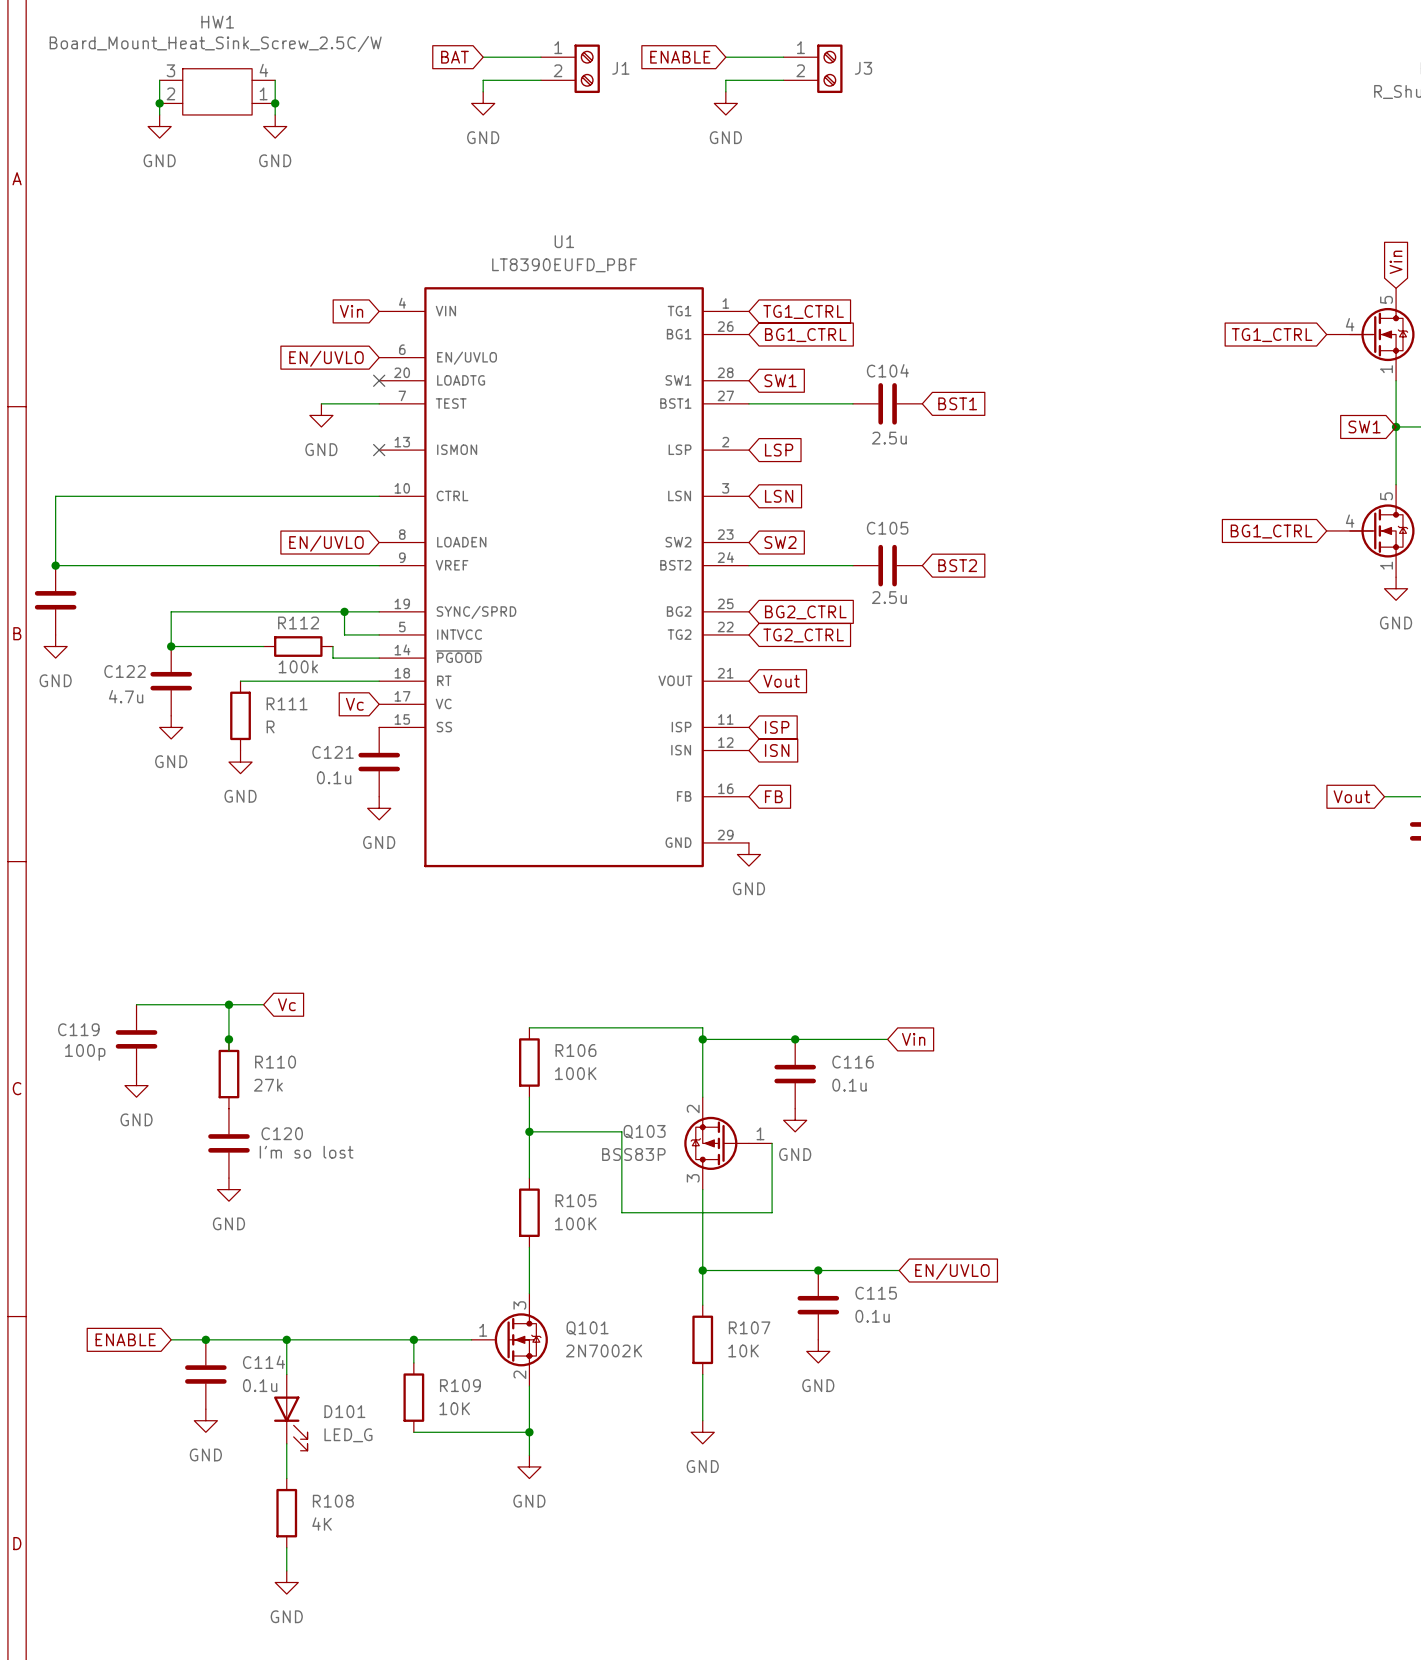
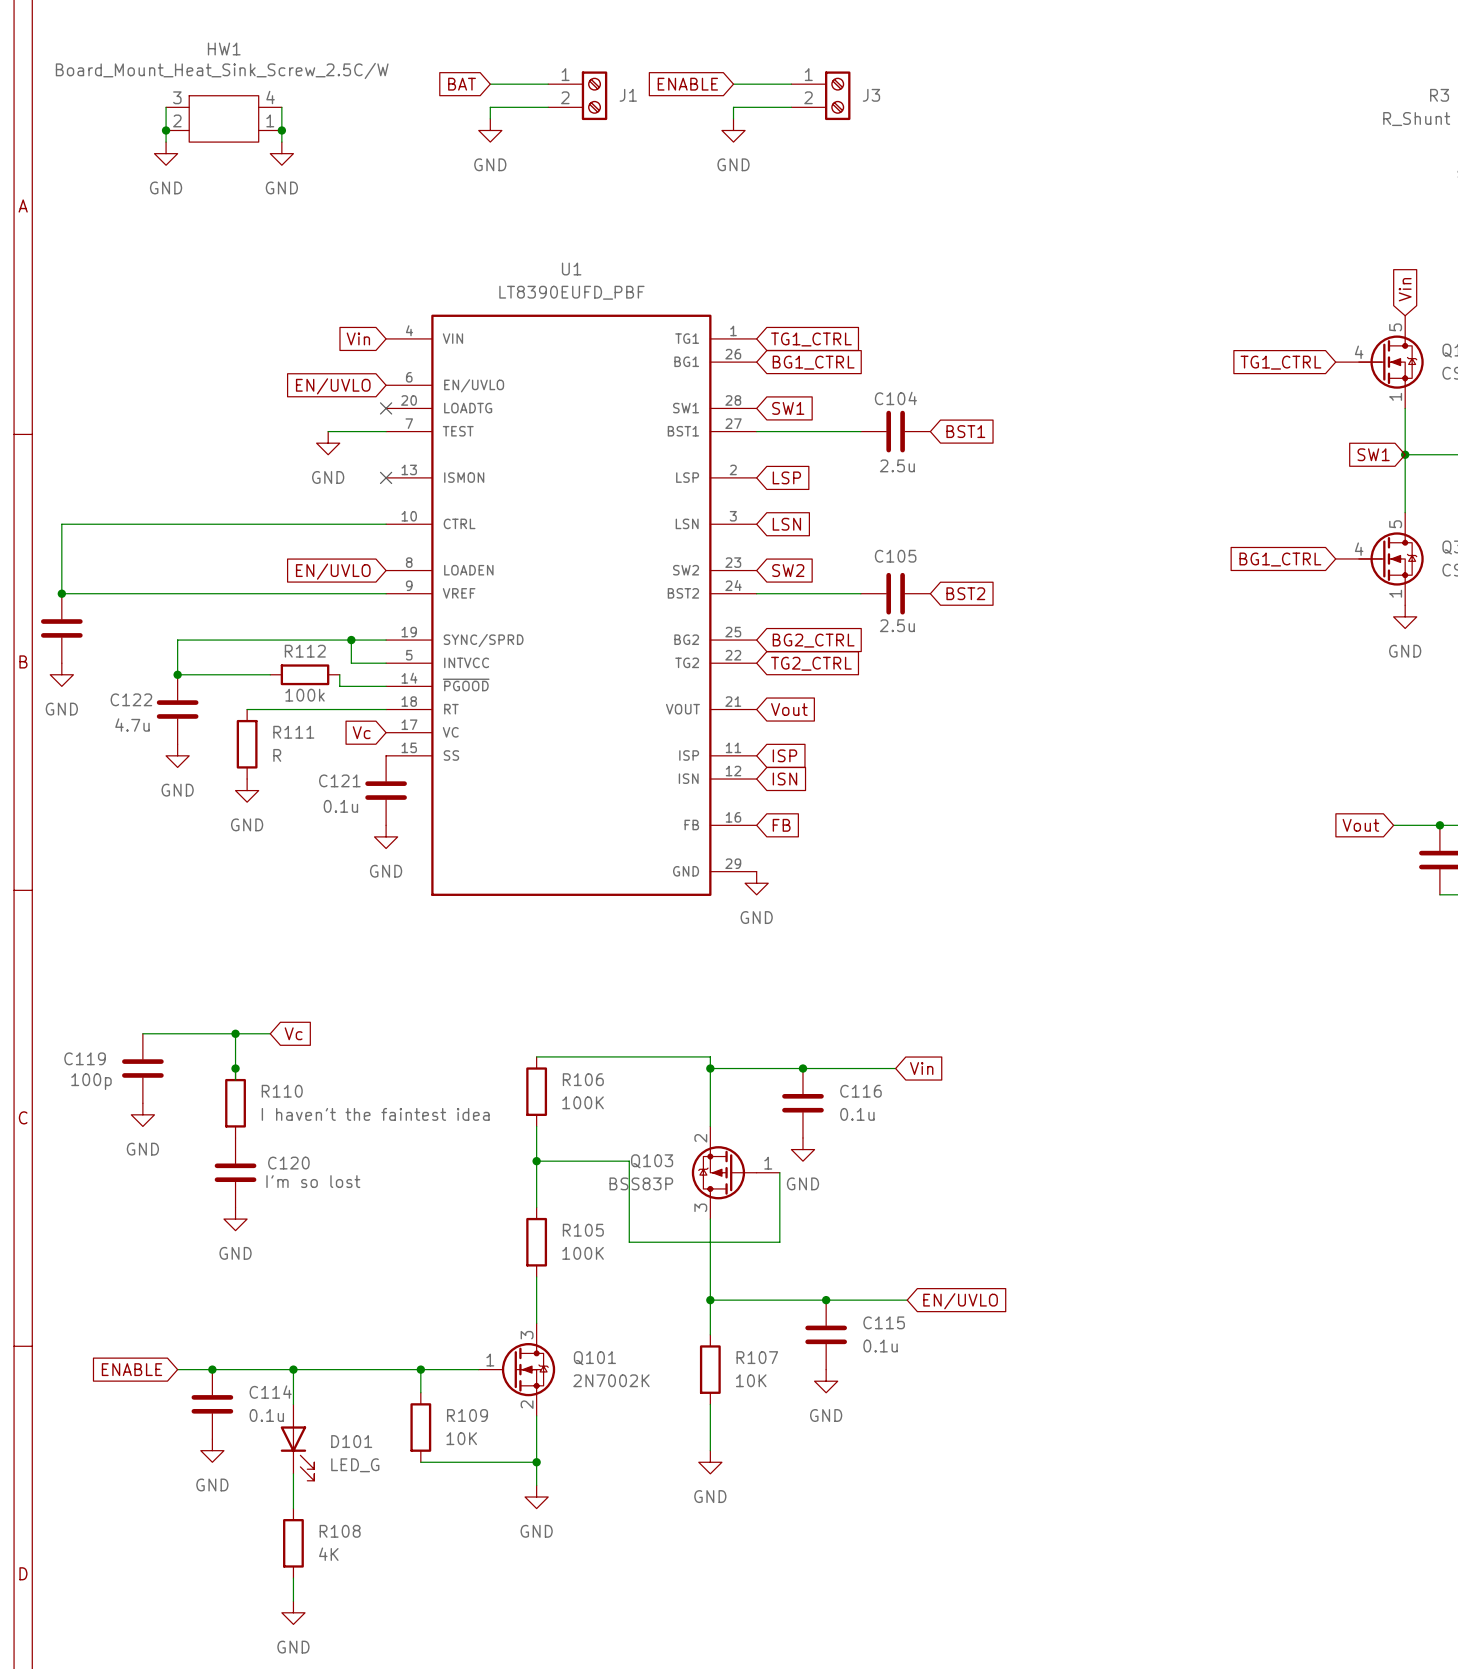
R110 value: 27k (268, 1085) -> I haven't the faintest idea (375, 1114)

